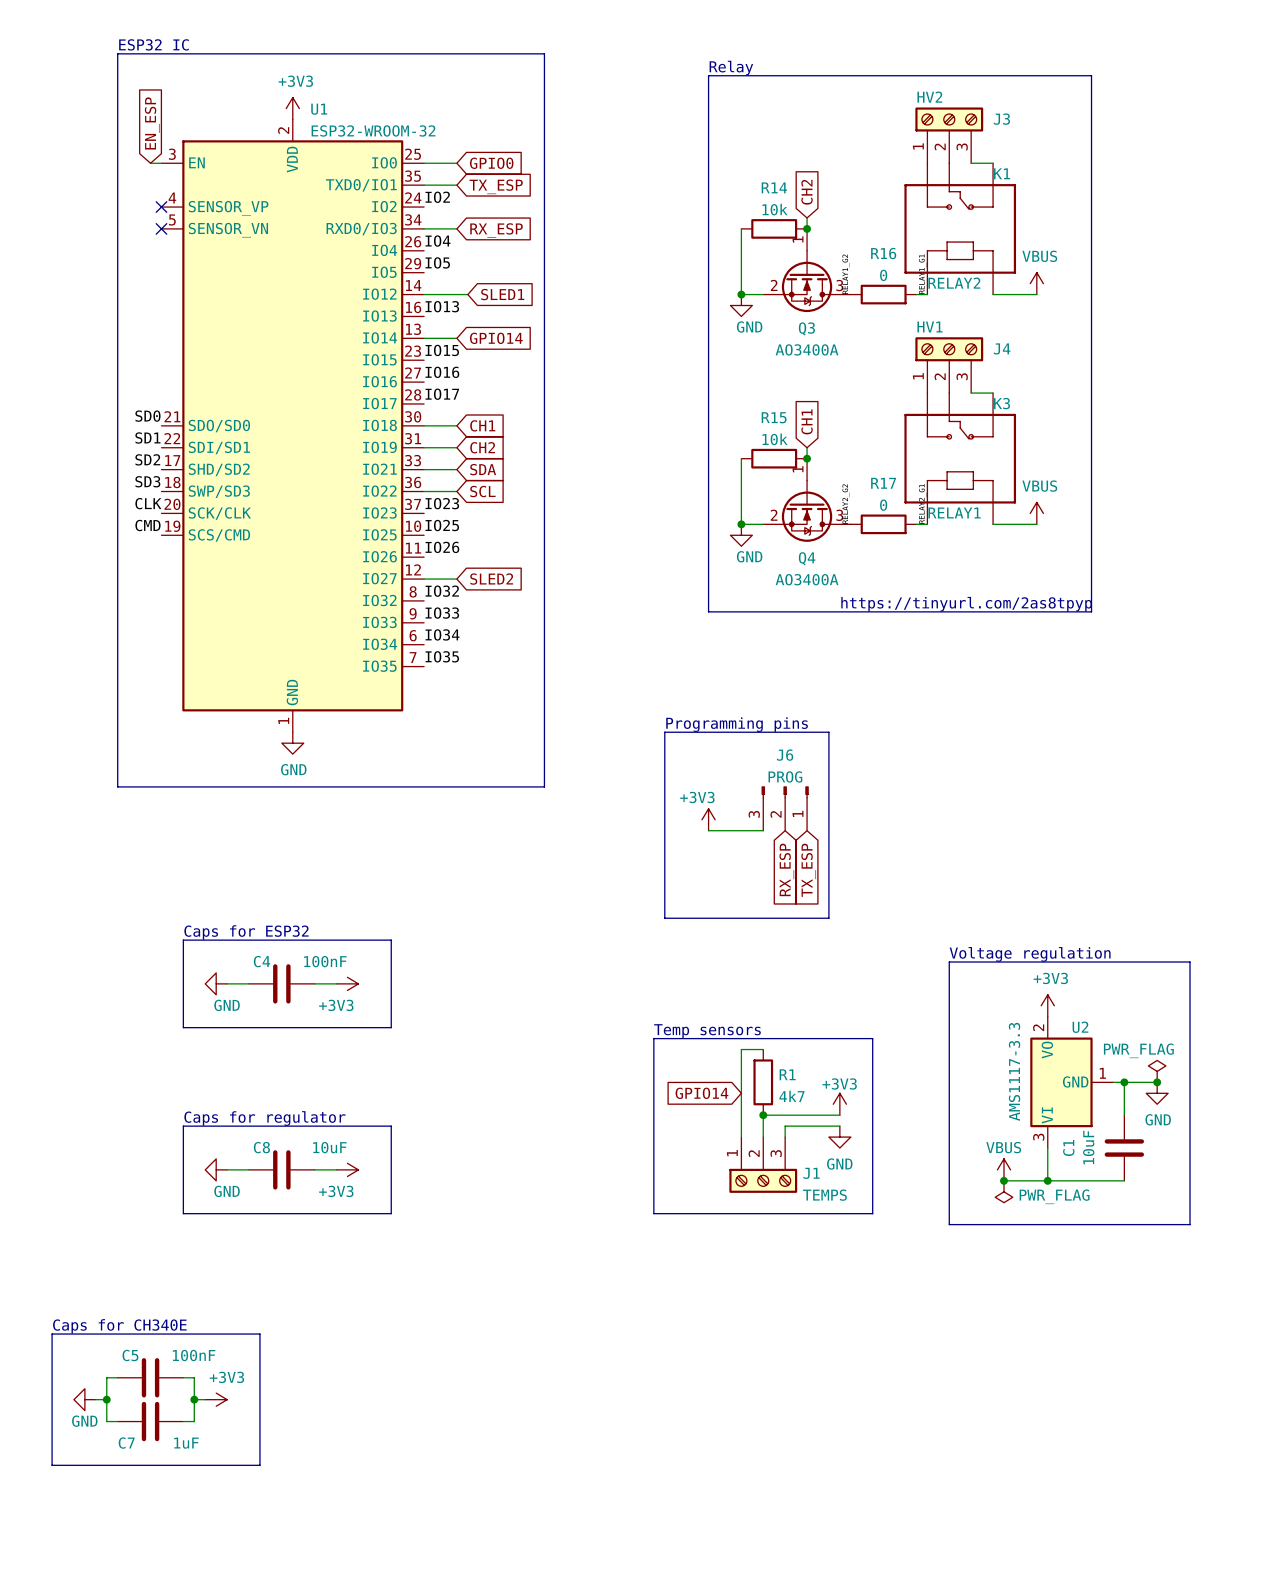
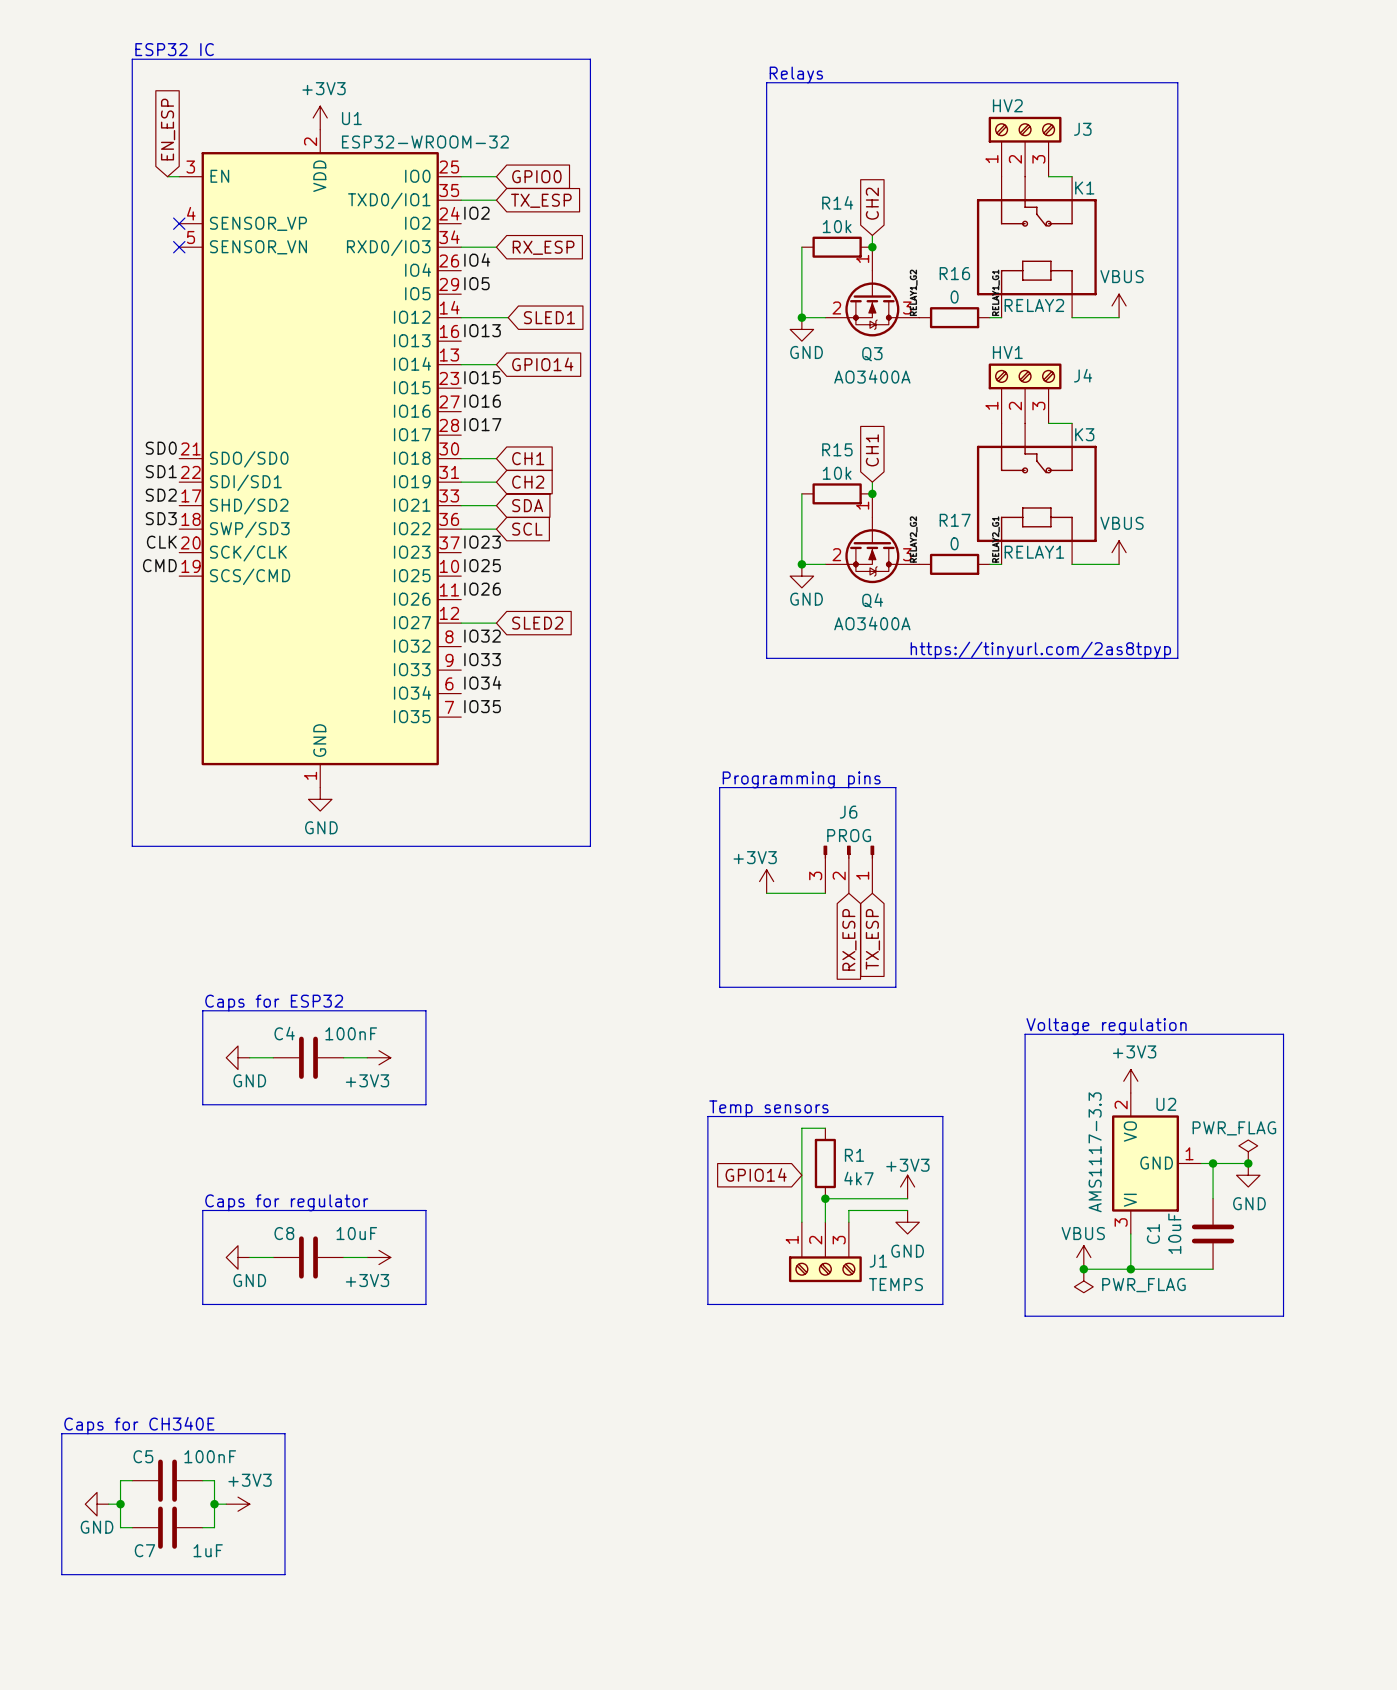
text: Relay (731, 68) -> Relays (796, 75)

